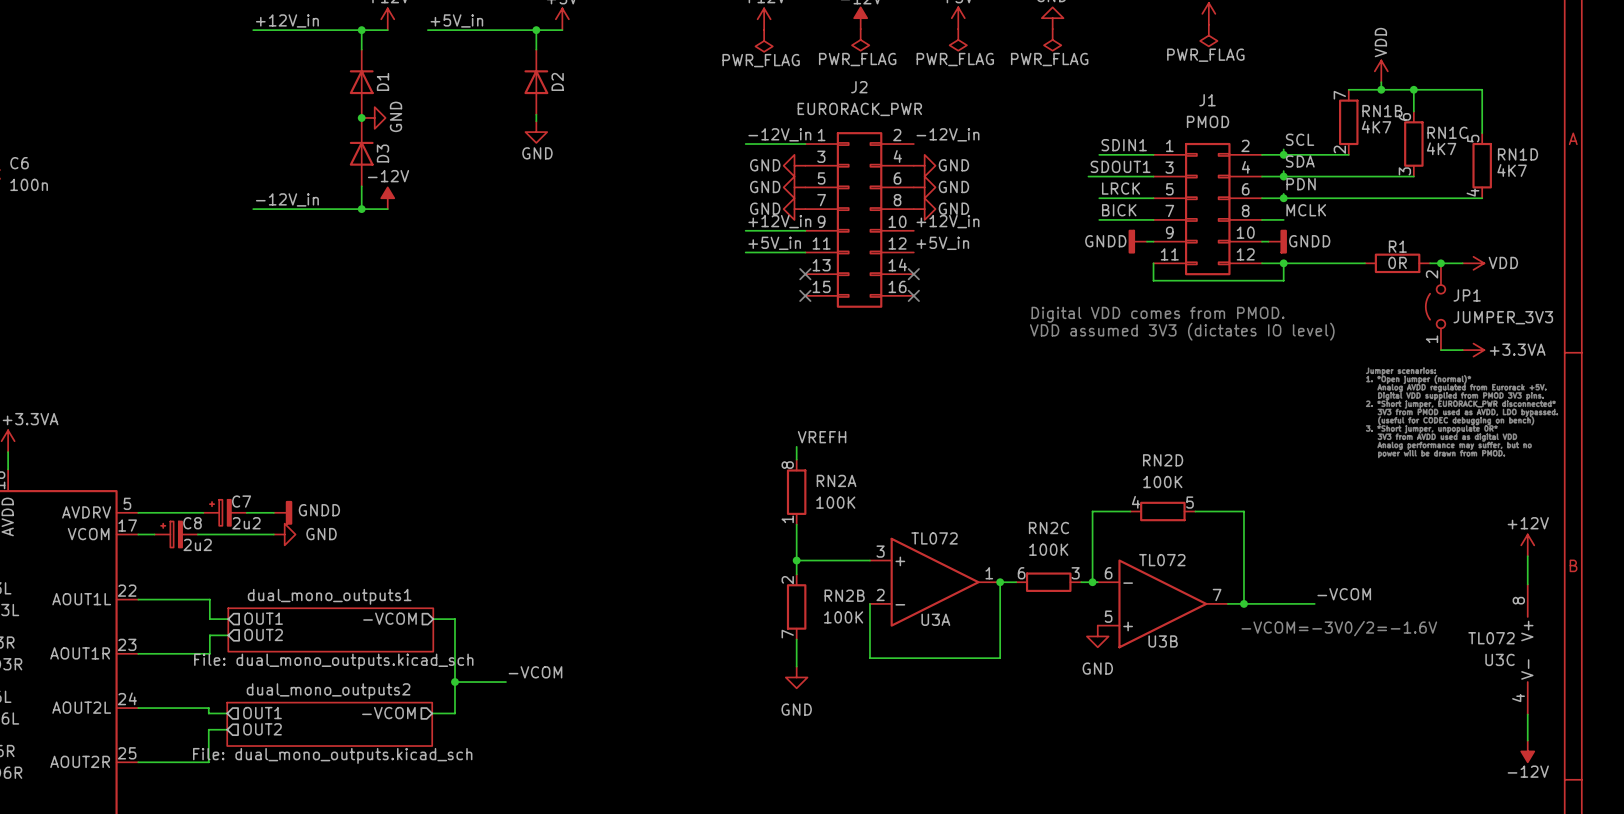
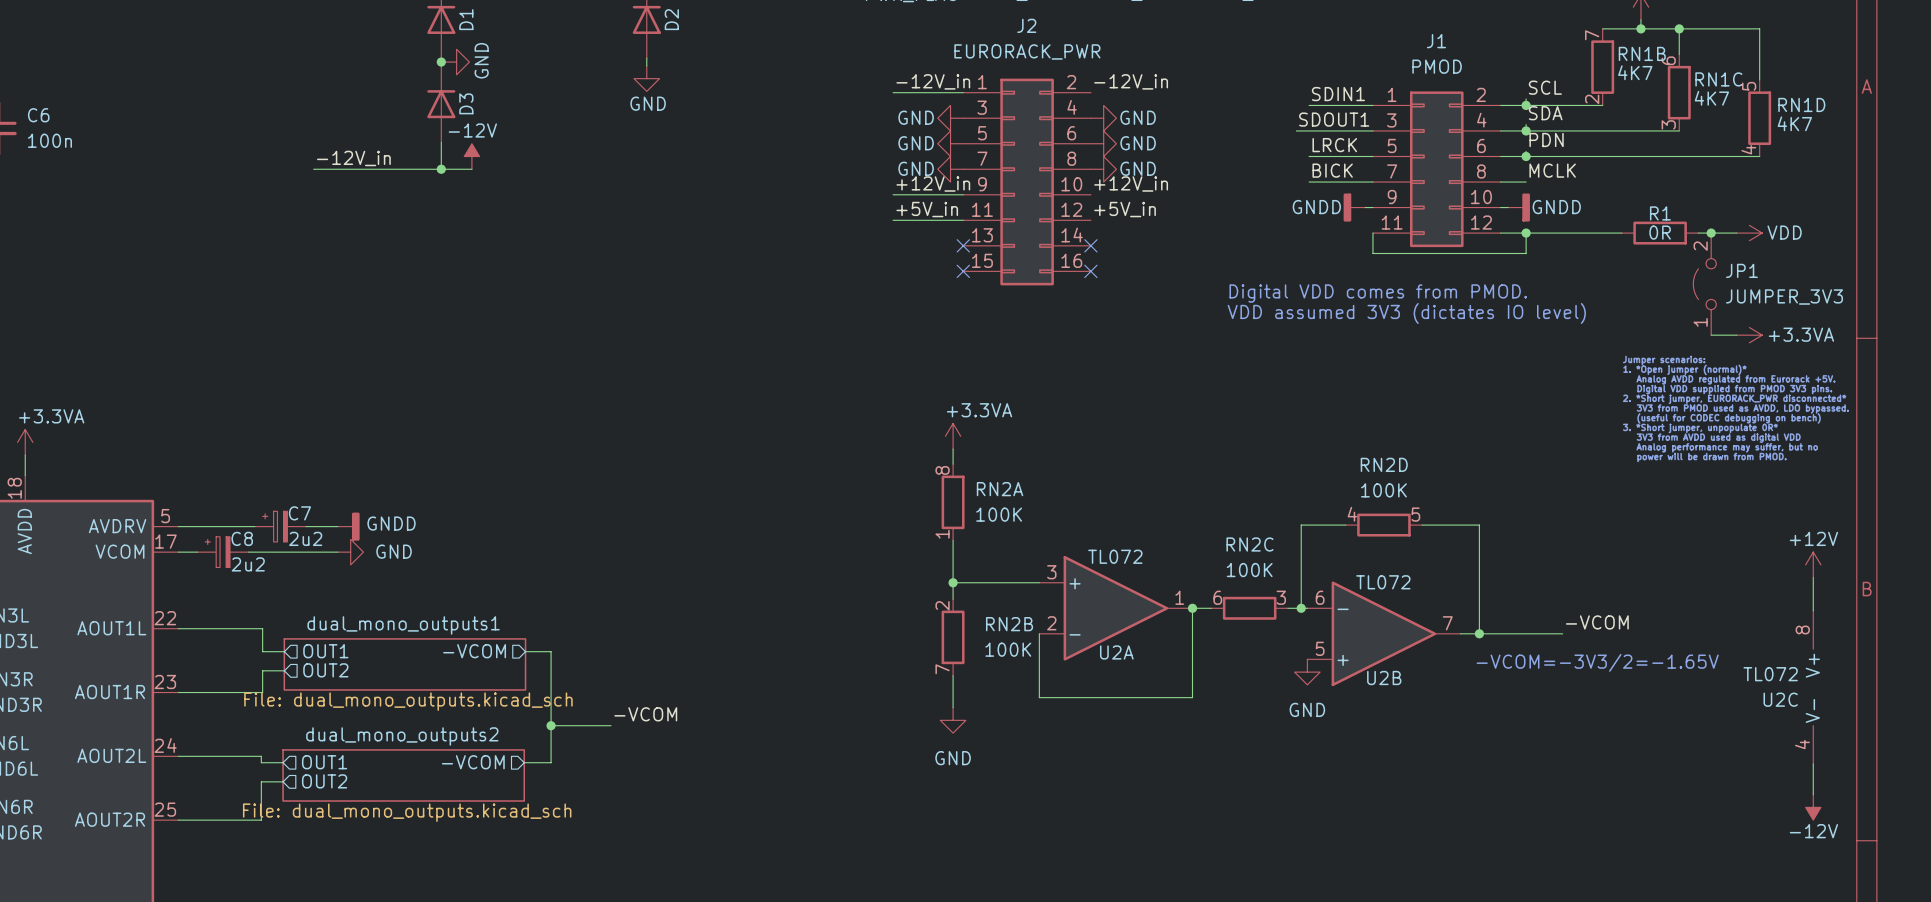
power symbol: none -> +3.3VA (953, 436)
label: VREFH (822, 437) -> none
U3A name: U3A (935, 619) -> U2A (1116, 652)
text: -VCOM=-3V0/2=-1.6V (1339, 628) -> -VCOM=-3V3/2=-1.65V (1597, 662)
U3B name: U3B (1163, 641) -> U2B (1384, 678)
U3C name: U3C (1500, 659) -> U2C (1780, 699)

